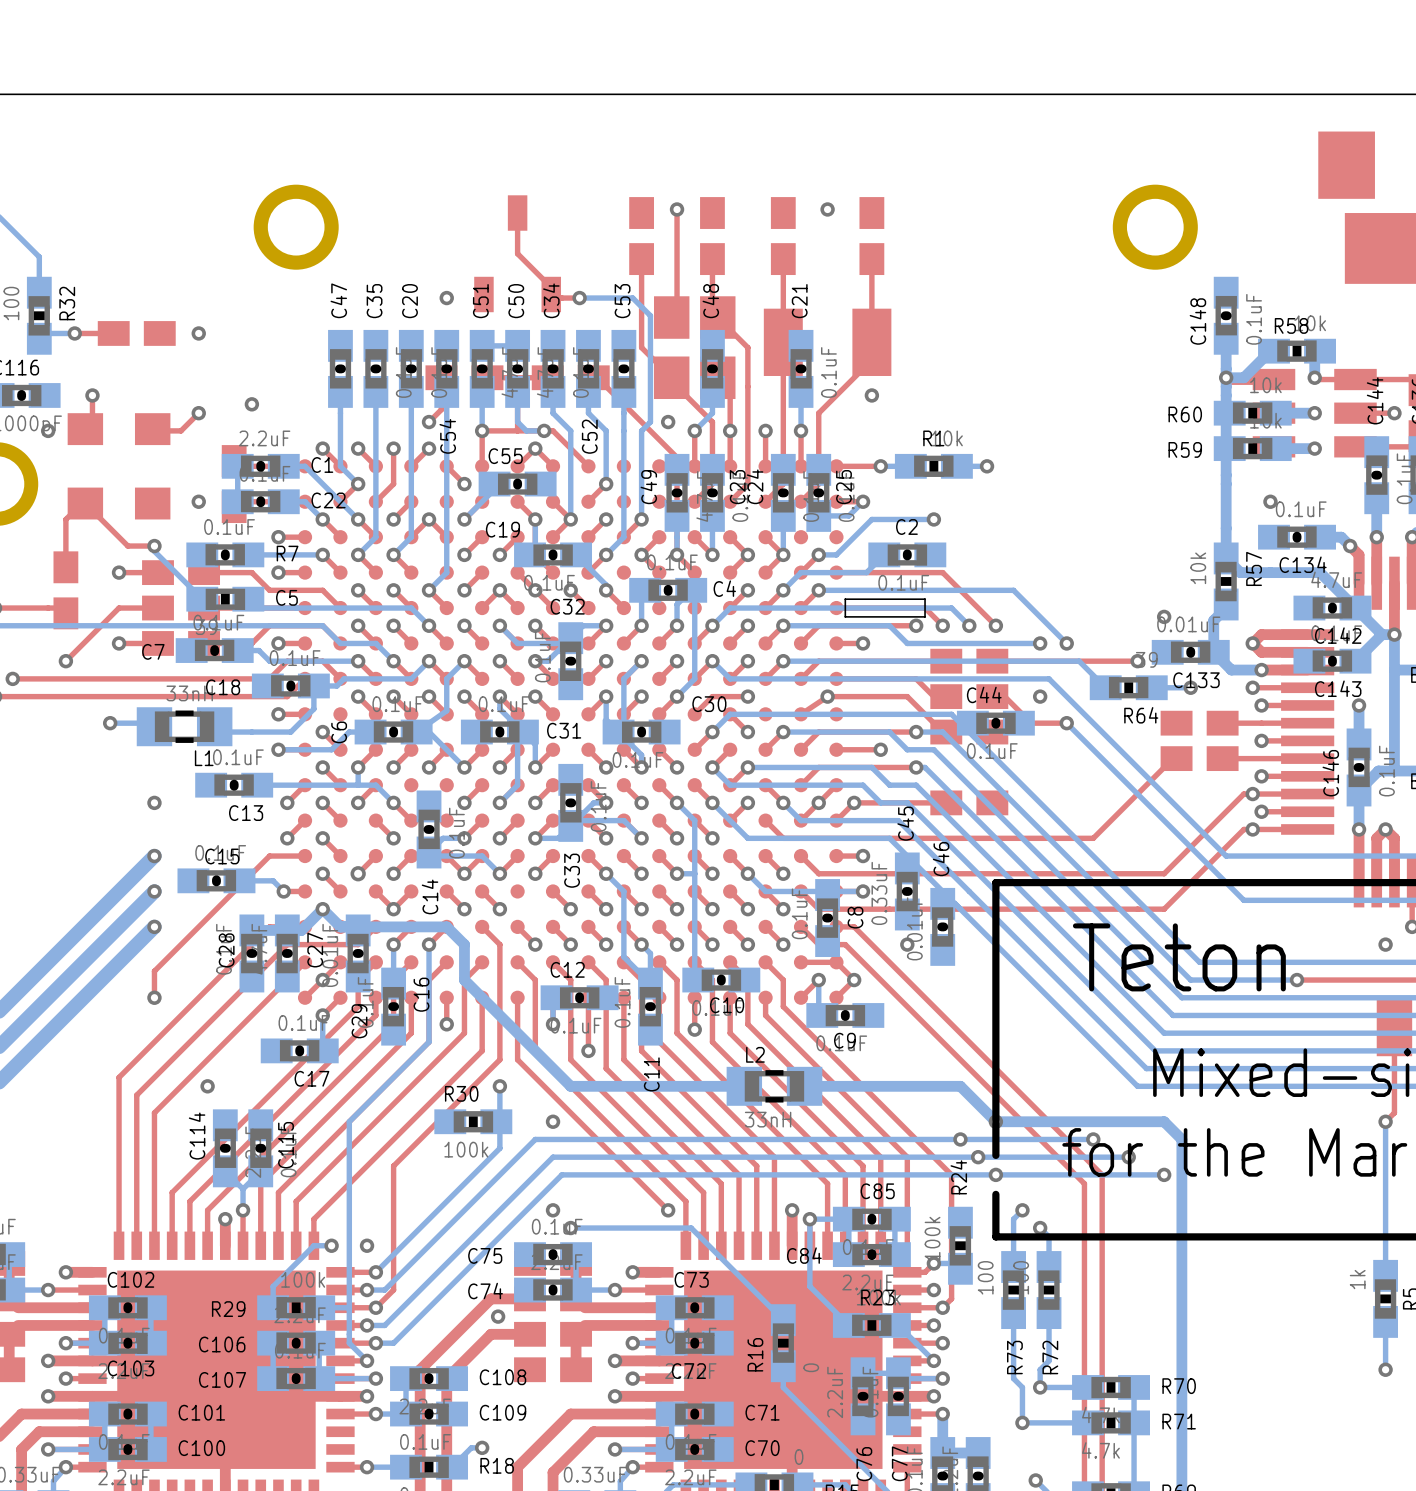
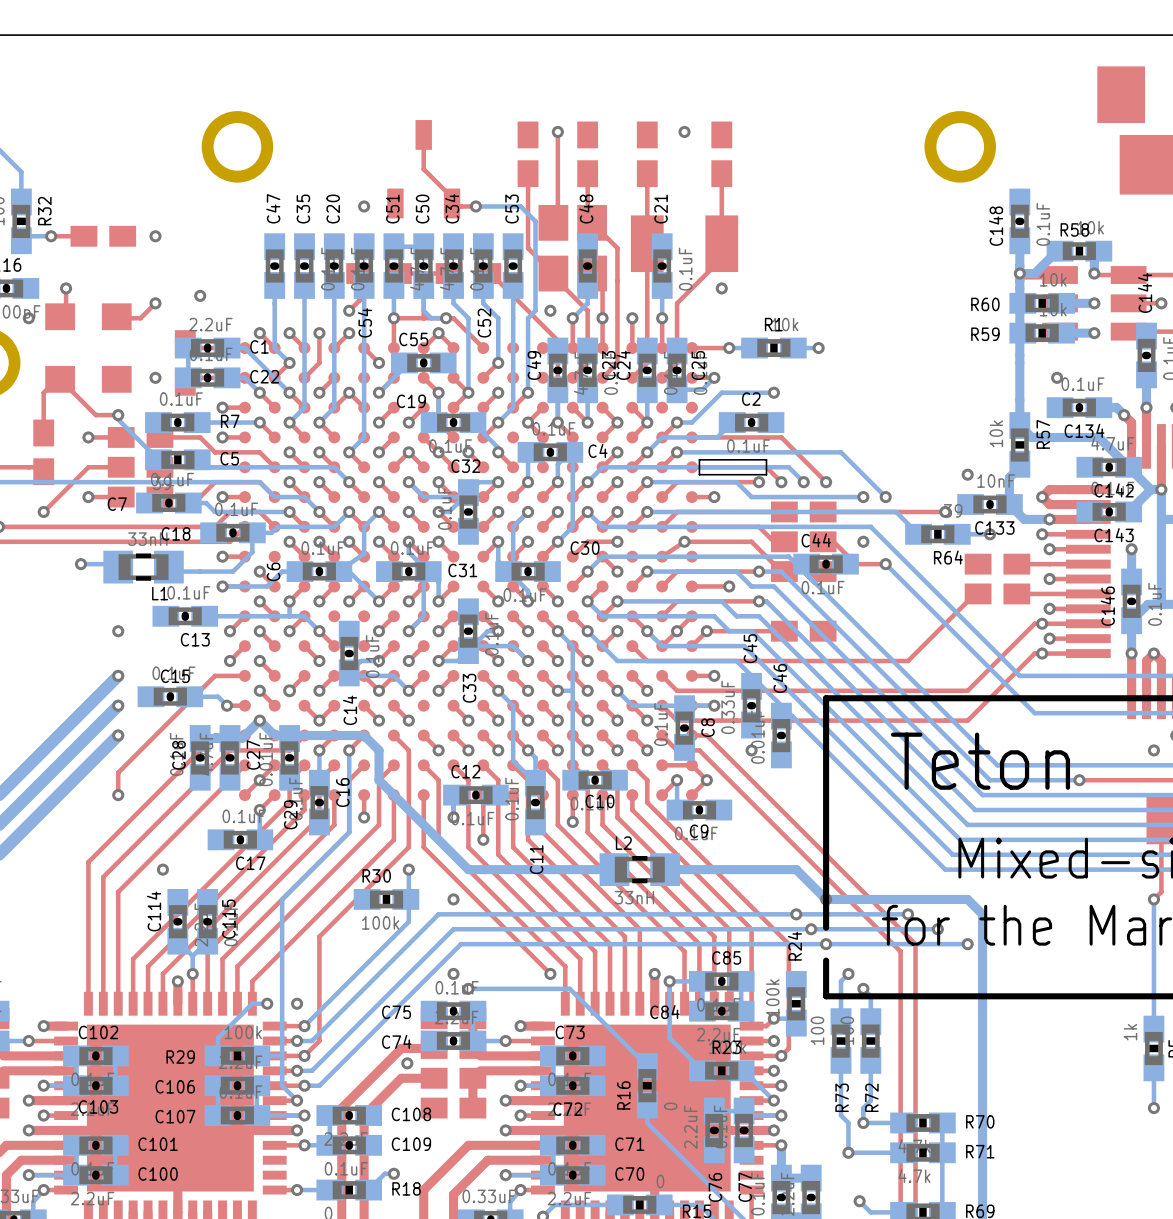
C133 value: 0.01uF (1188, 624) -> 10nF (996, 481)

